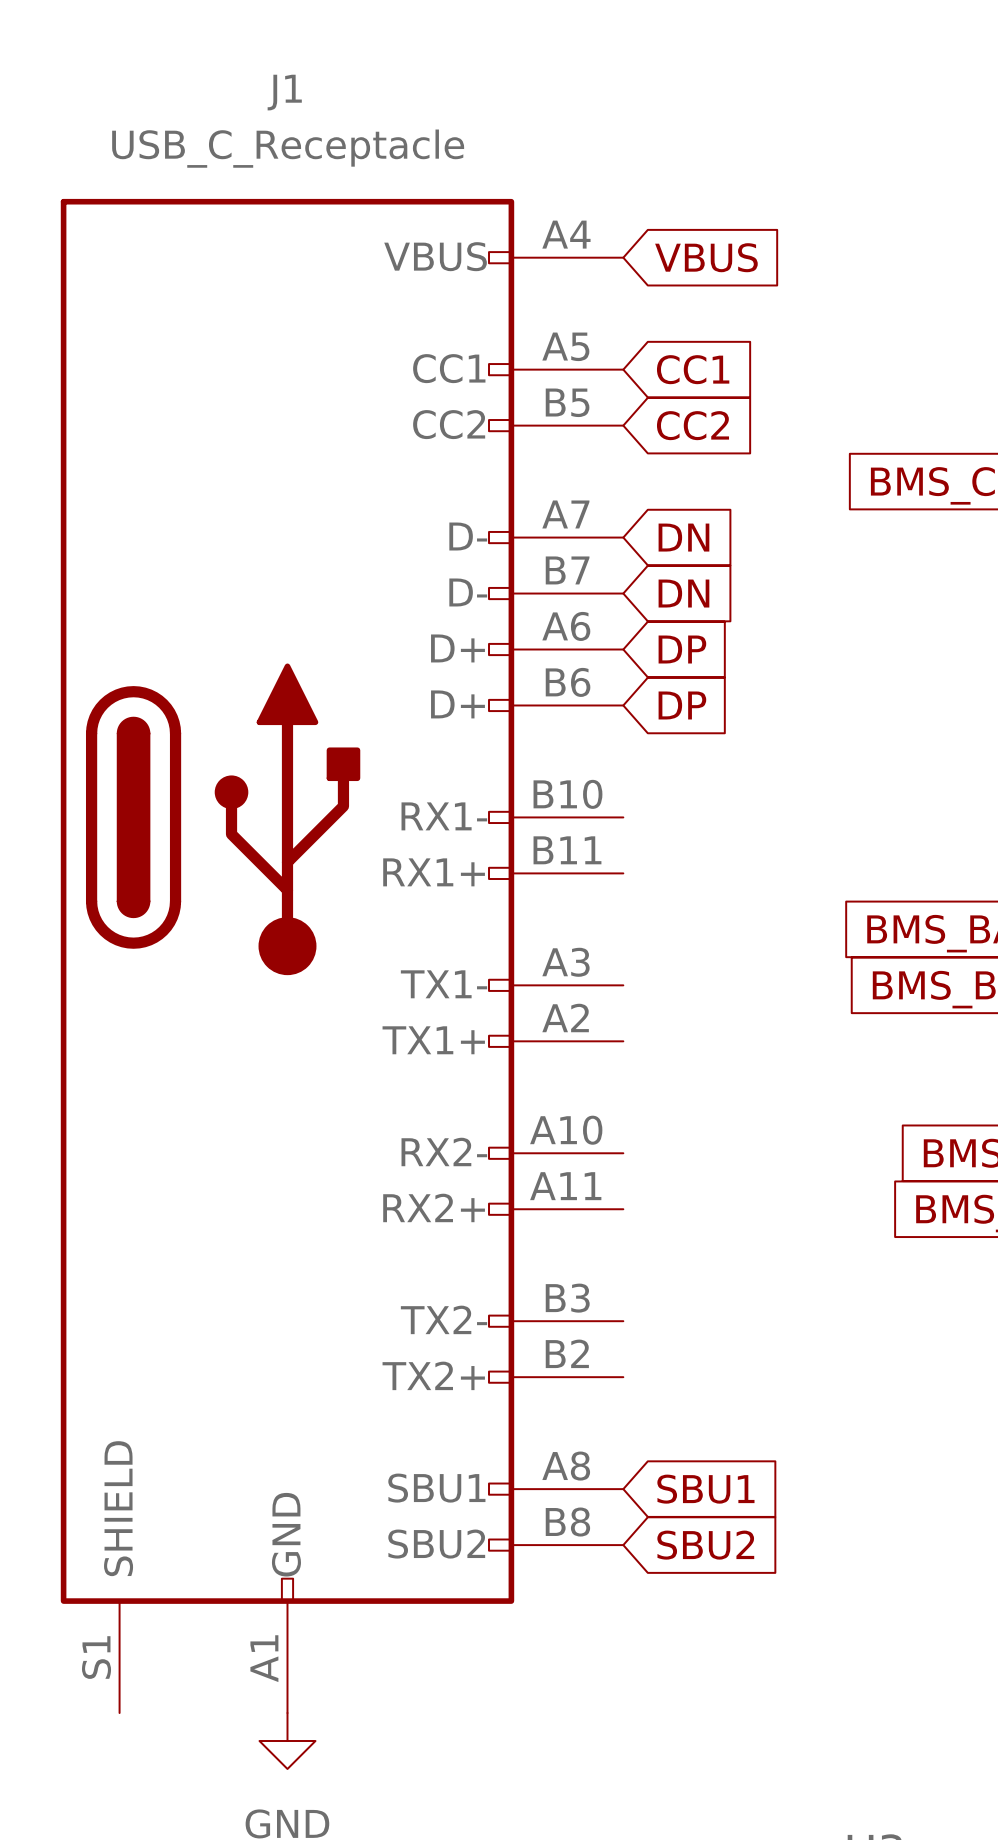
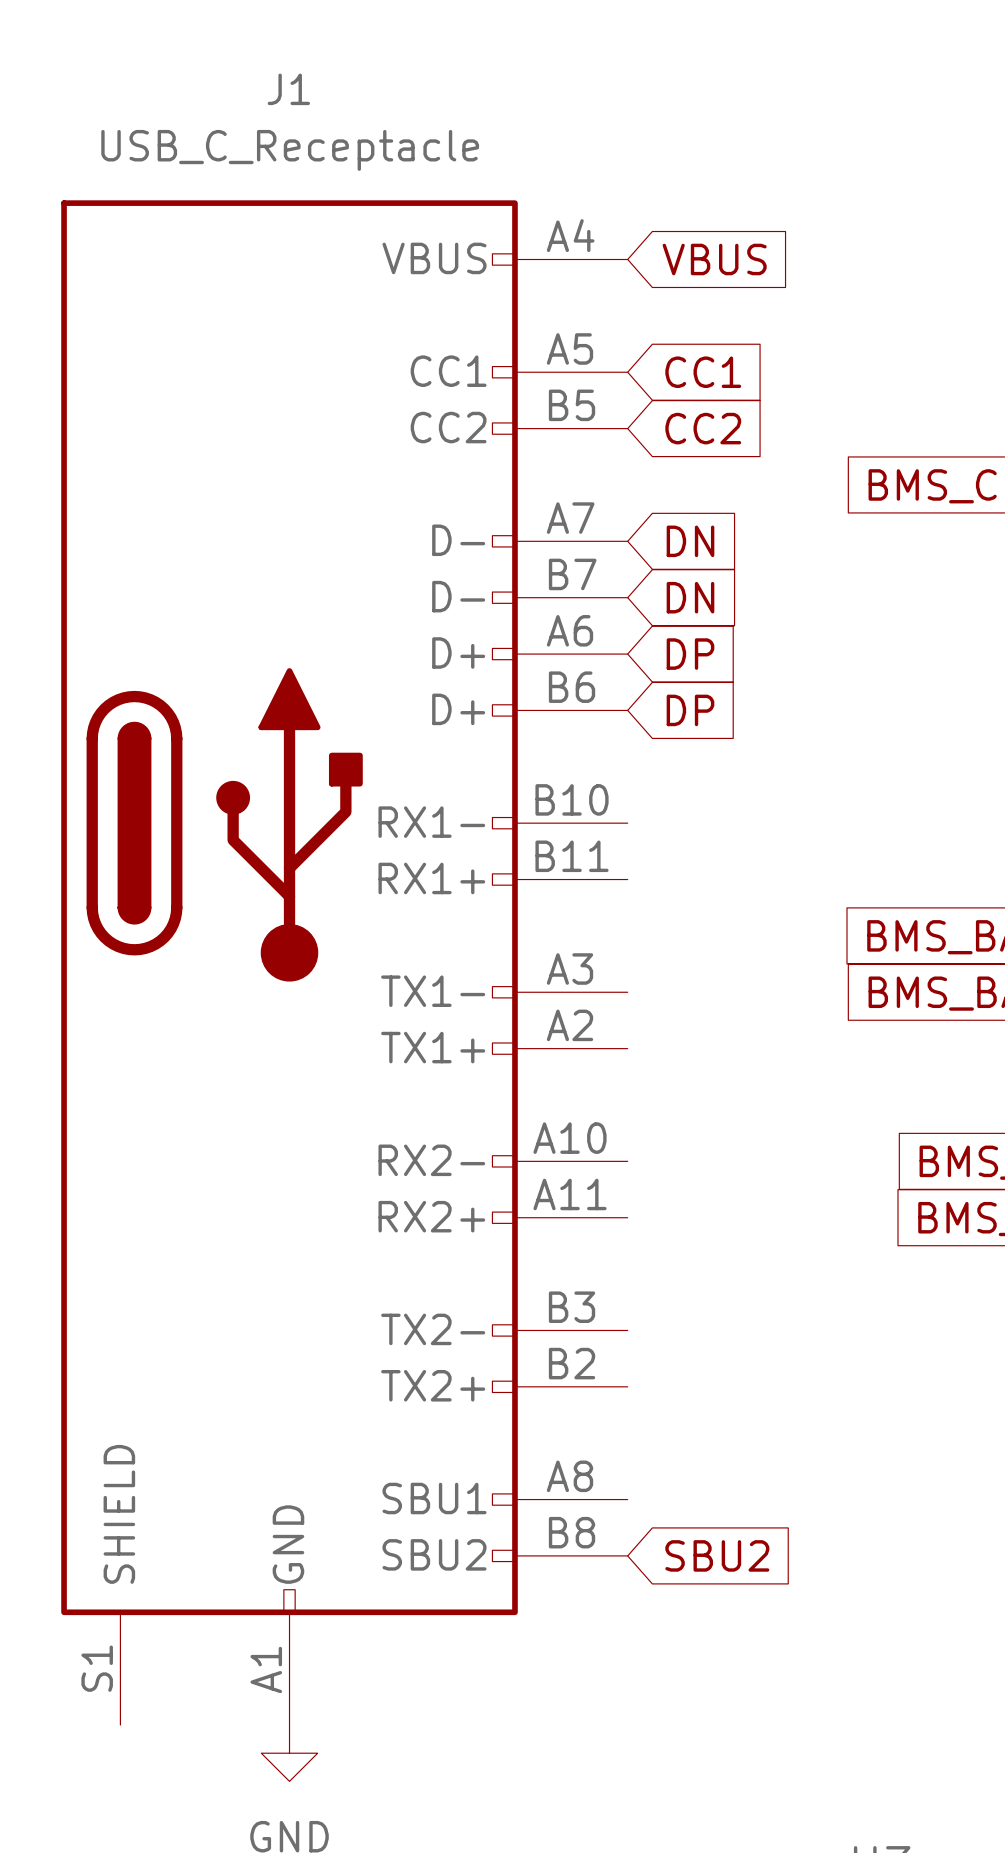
global label: SBU1 (705, 1489) -> none

